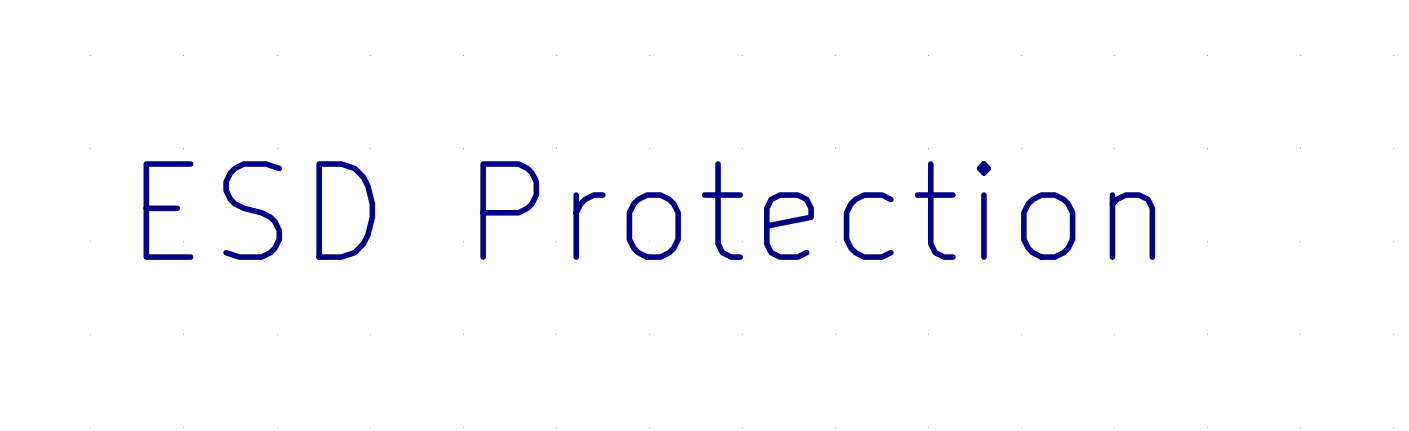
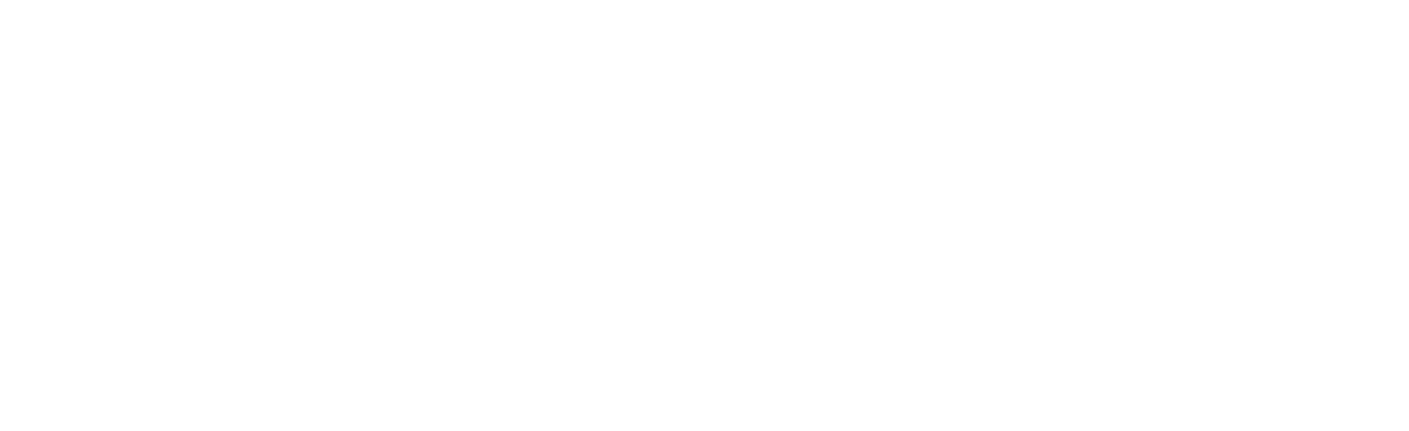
text: ESD Protection (649, 210) -> none

